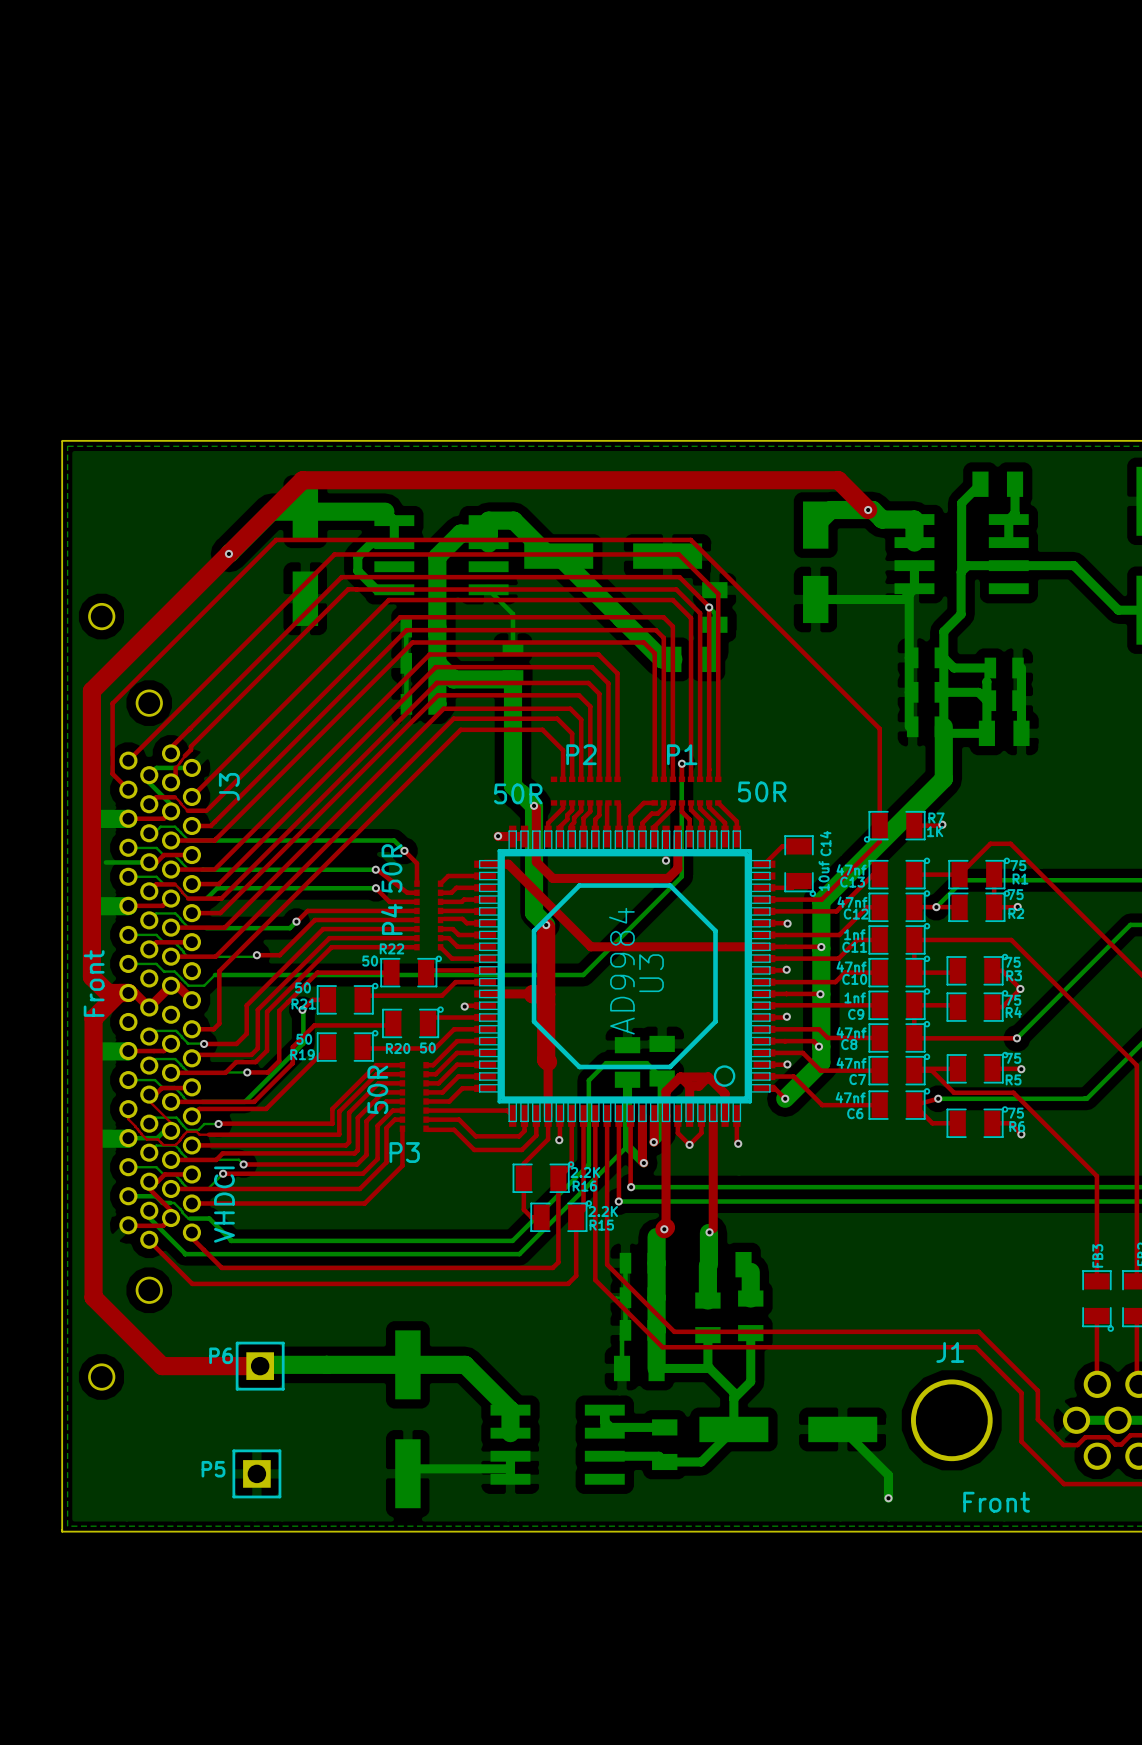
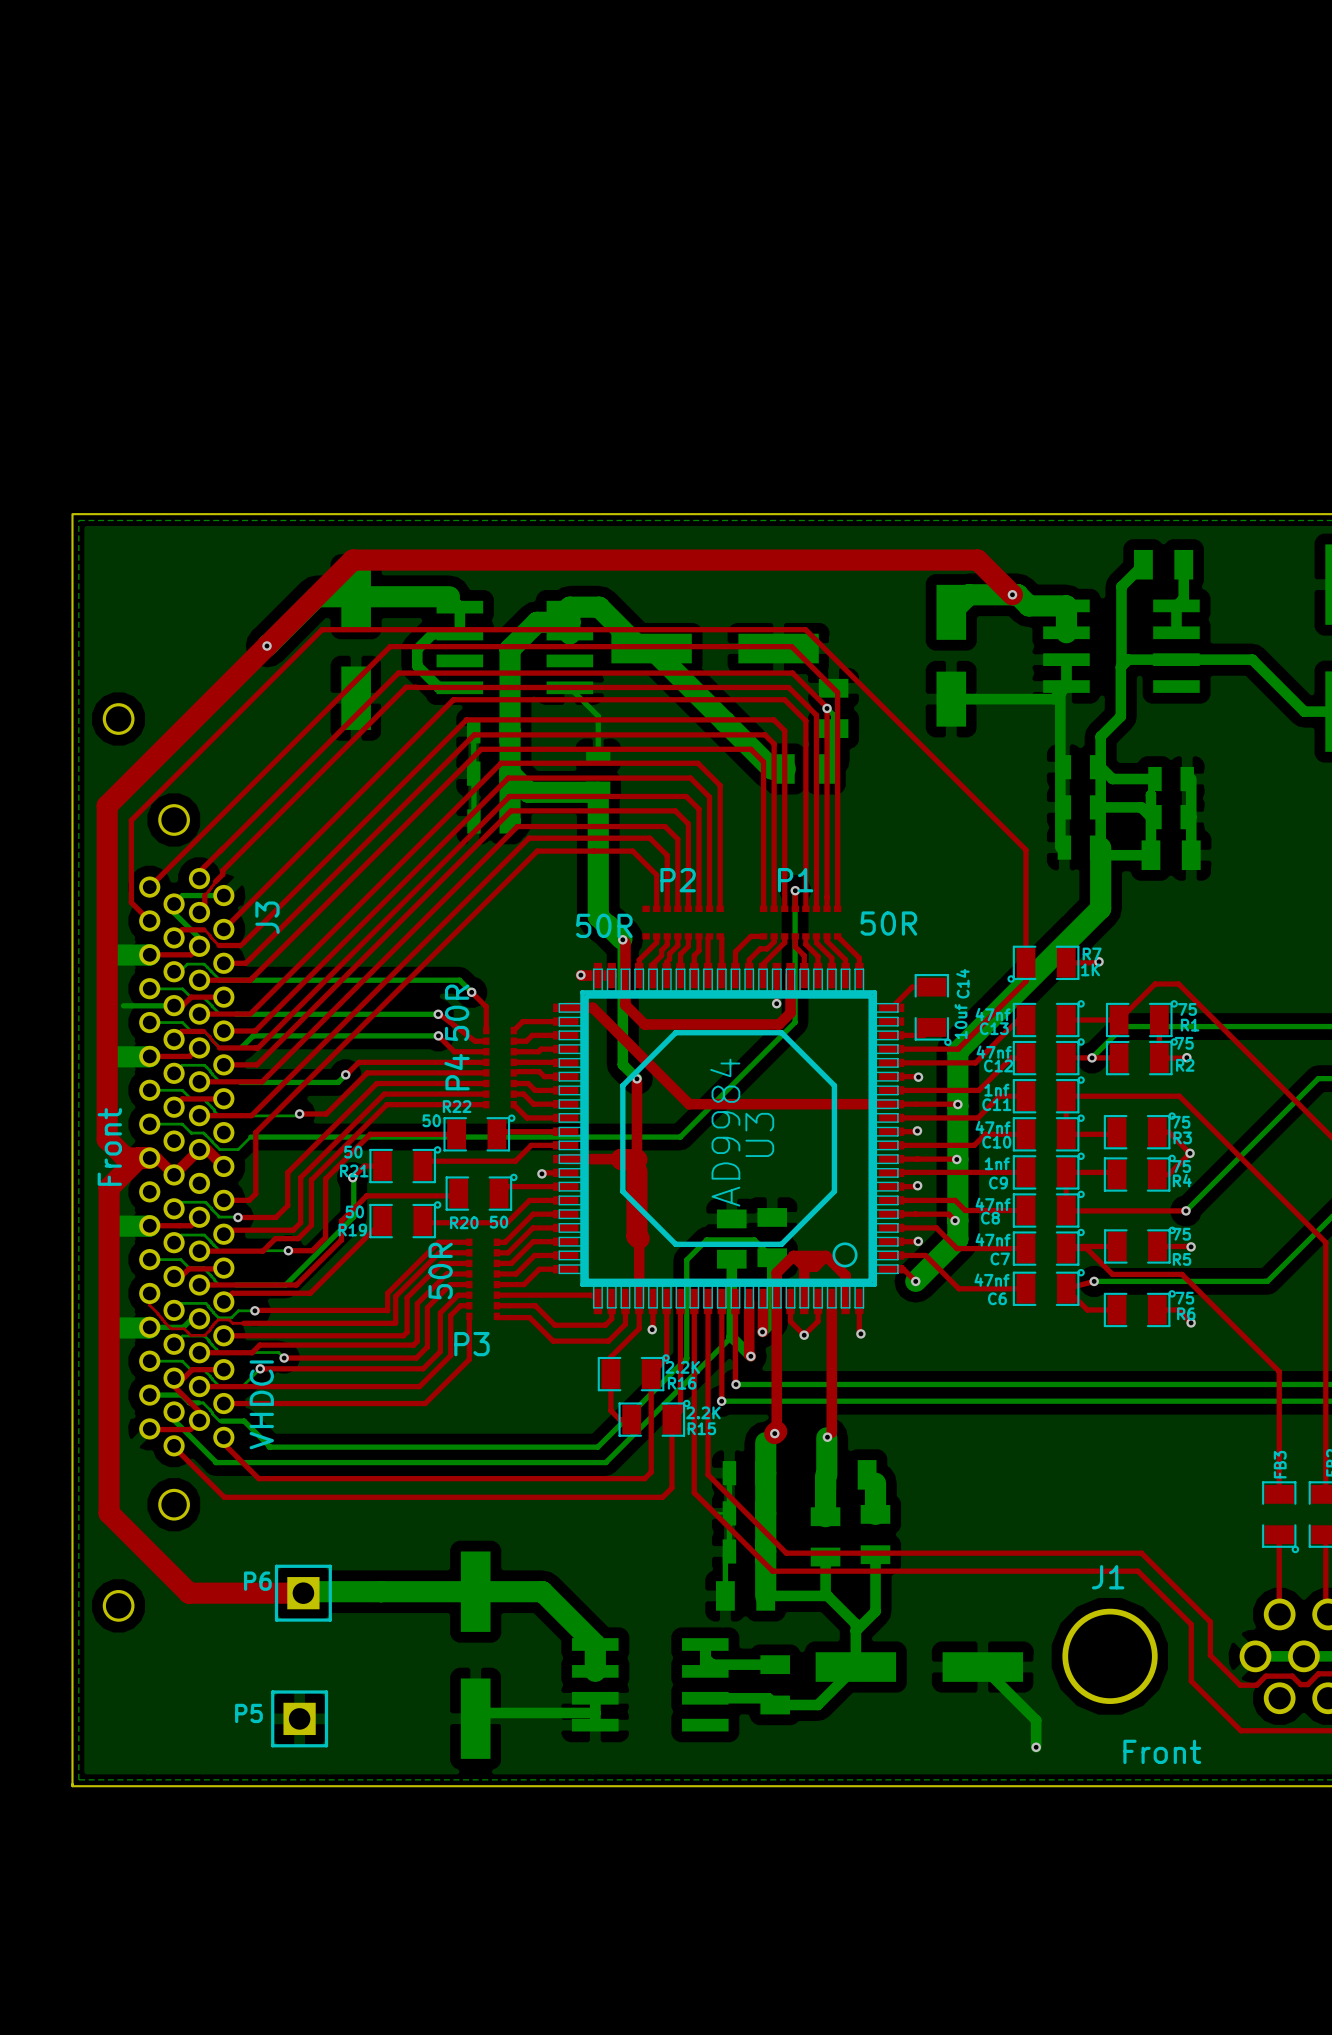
bottom track width: thick (534, 805) (534, 912) (546, 925) -> thin (622, 939) (622, 1064) (636, 1078)
top track width: thick (546, 927) (546, 1004) -> thin (636, 1081) (636, 1171)
top track: (149, 1094) (149, 1101) (171, 1122) (171, 1130) -> none

